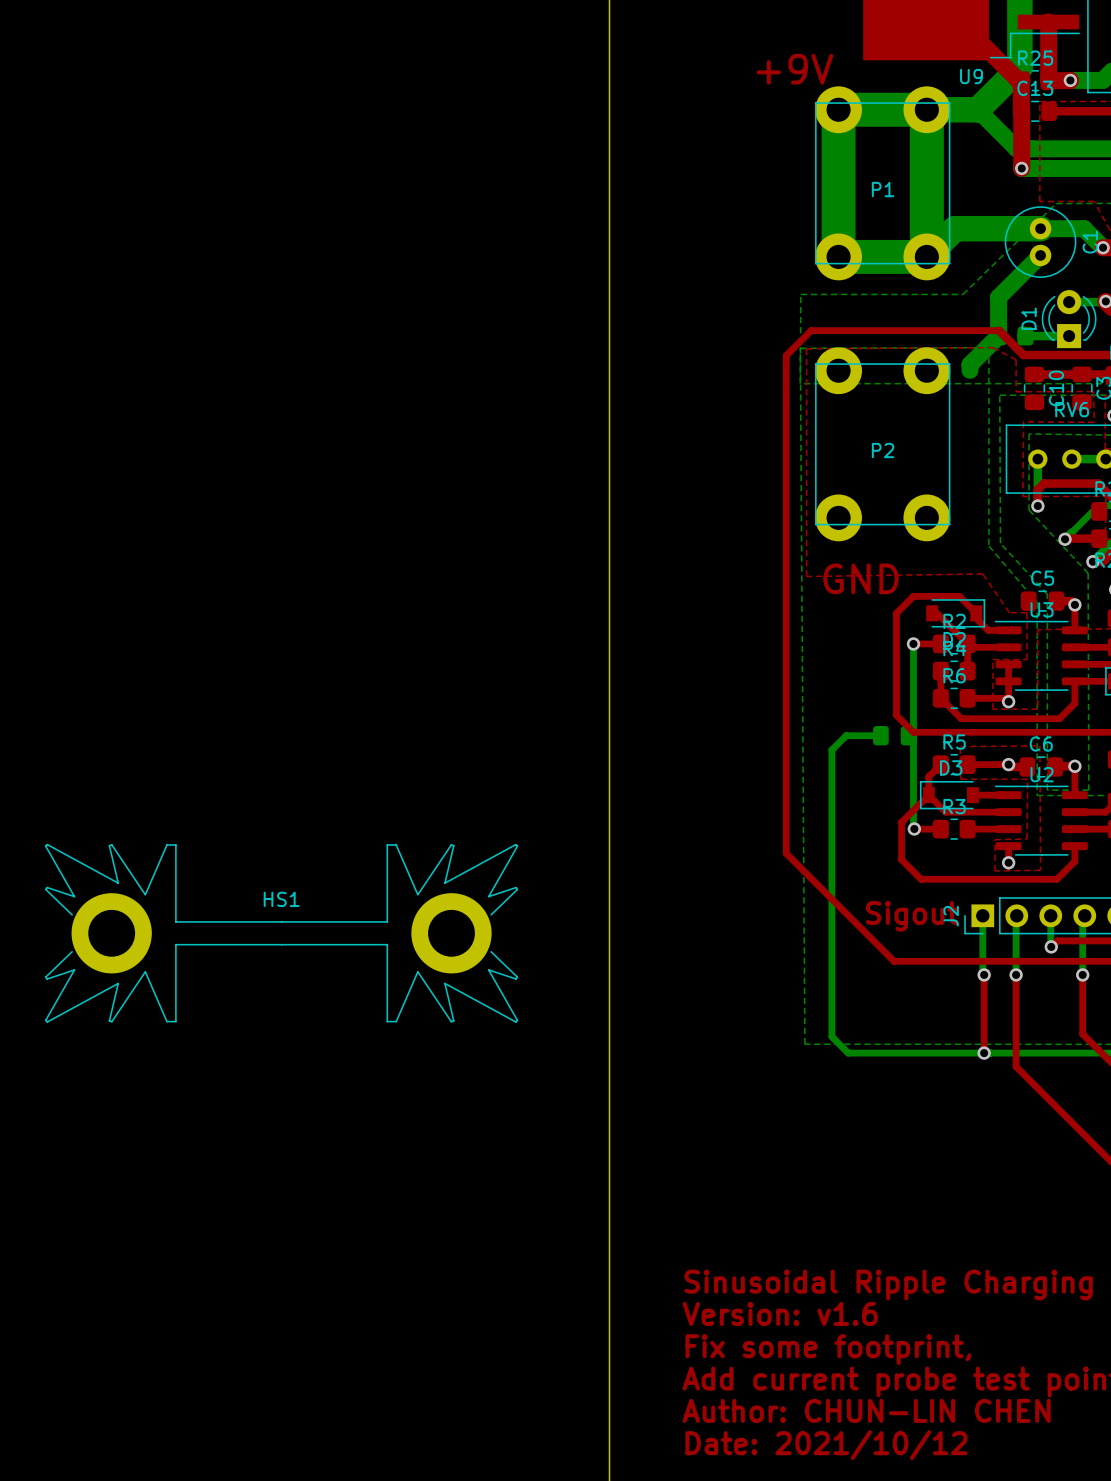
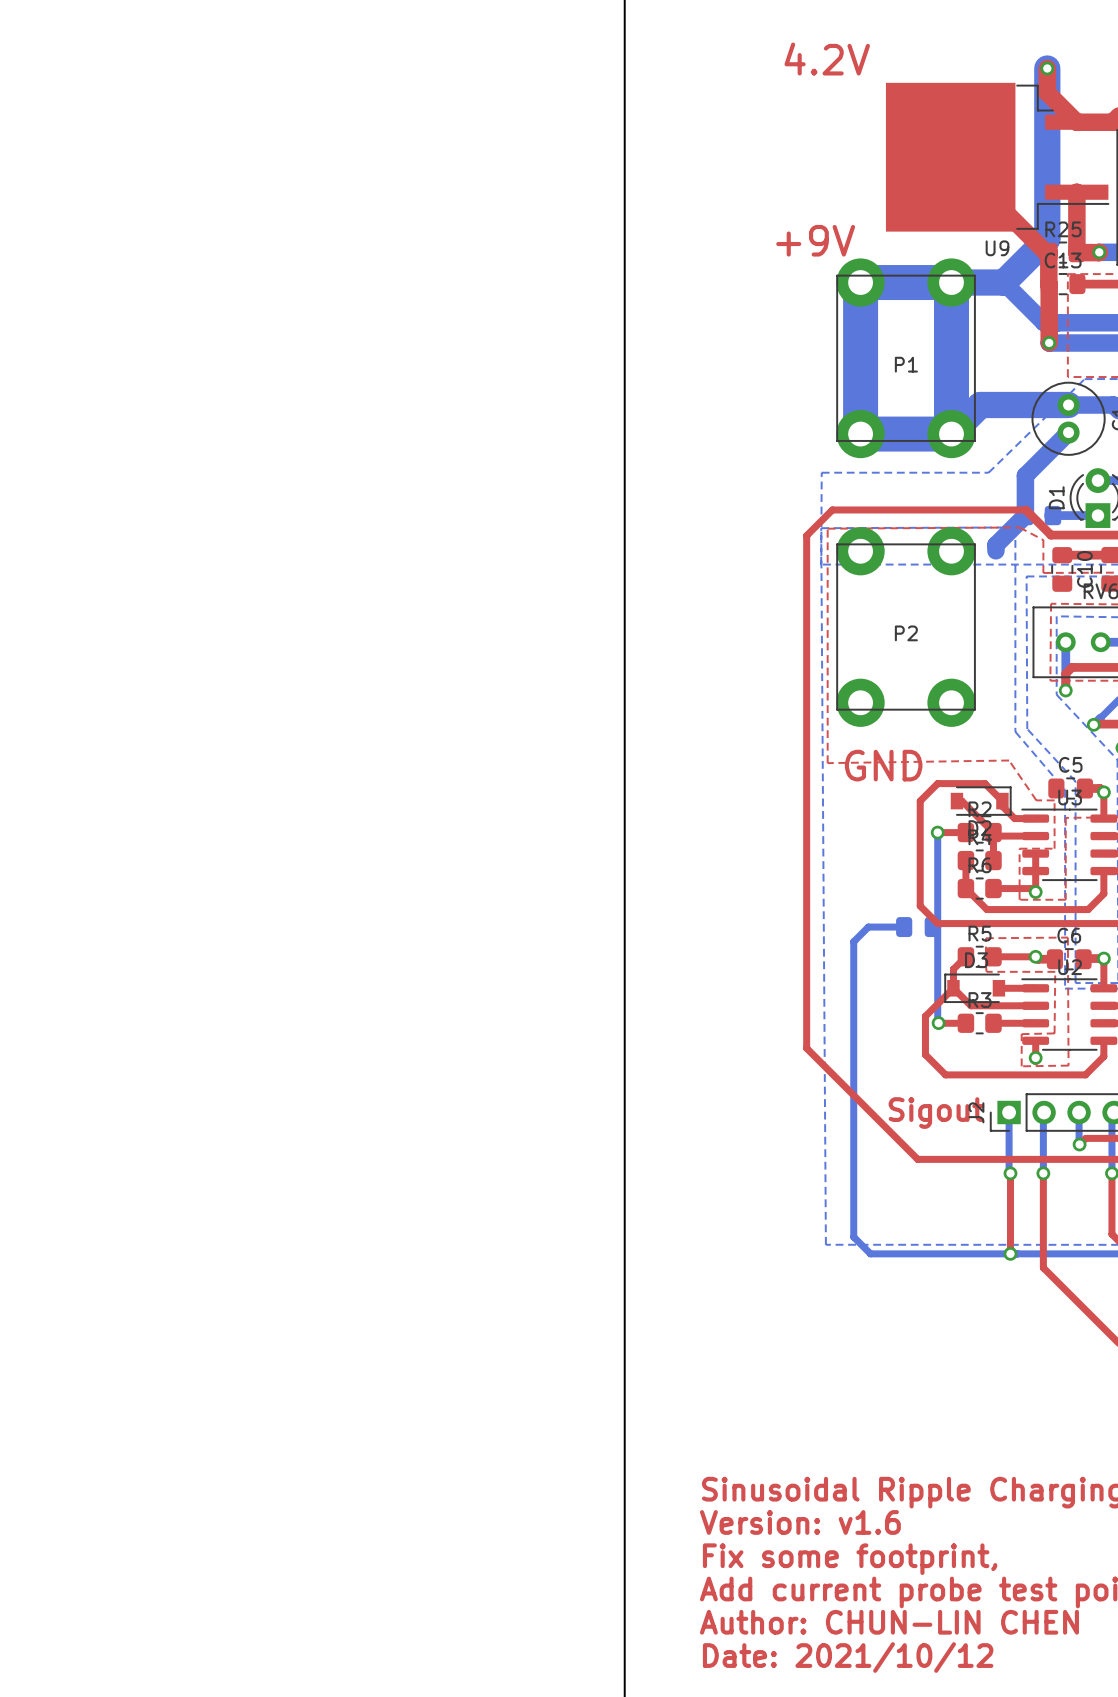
HS1: (281, 933) -> none

